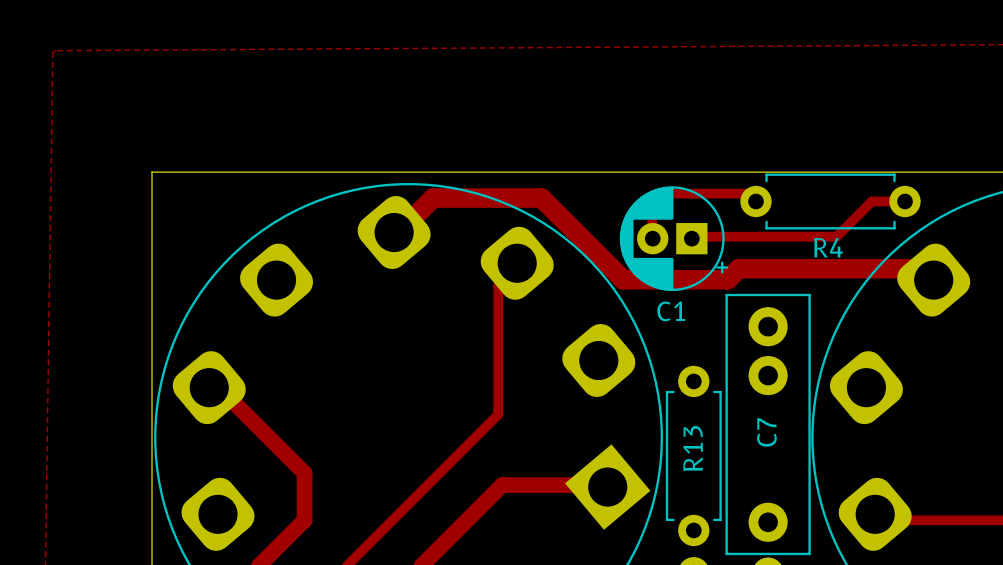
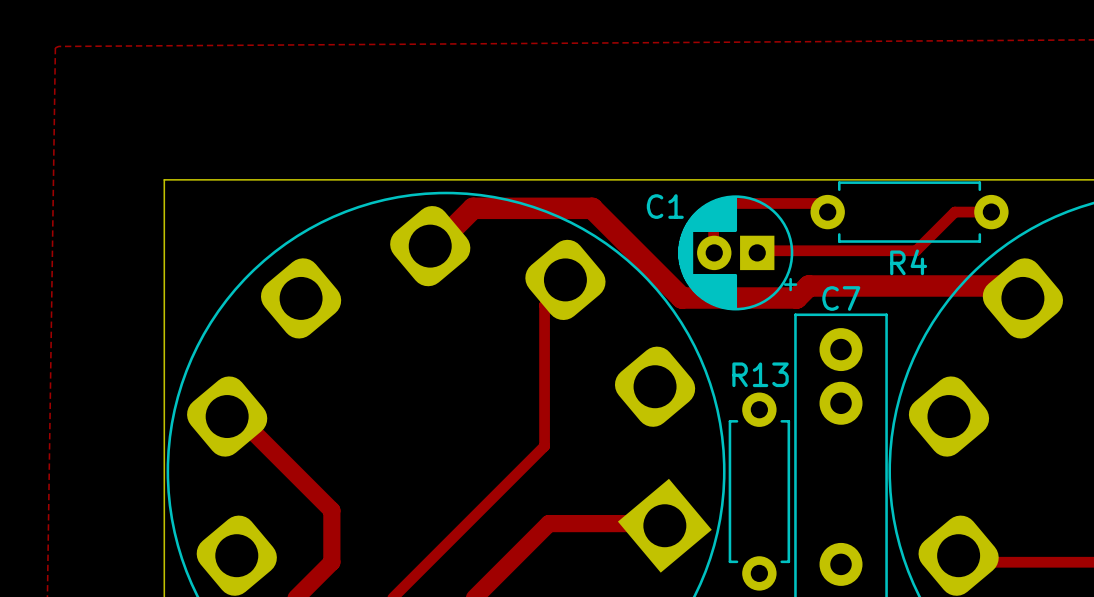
C1 name position: C1 (671, 311) -> C1 (665, 206)
C7 name rotation: 0° (766, 432) -> 90° clockwise (841, 298)
C7 name position: C7 (766, 432) -> C7 (841, 298)
R13 name rotation: 0° (693, 448) -> 90° clockwise (760, 374)
R13 name position: R13 (693, 448) -> R13 (760, 374)

